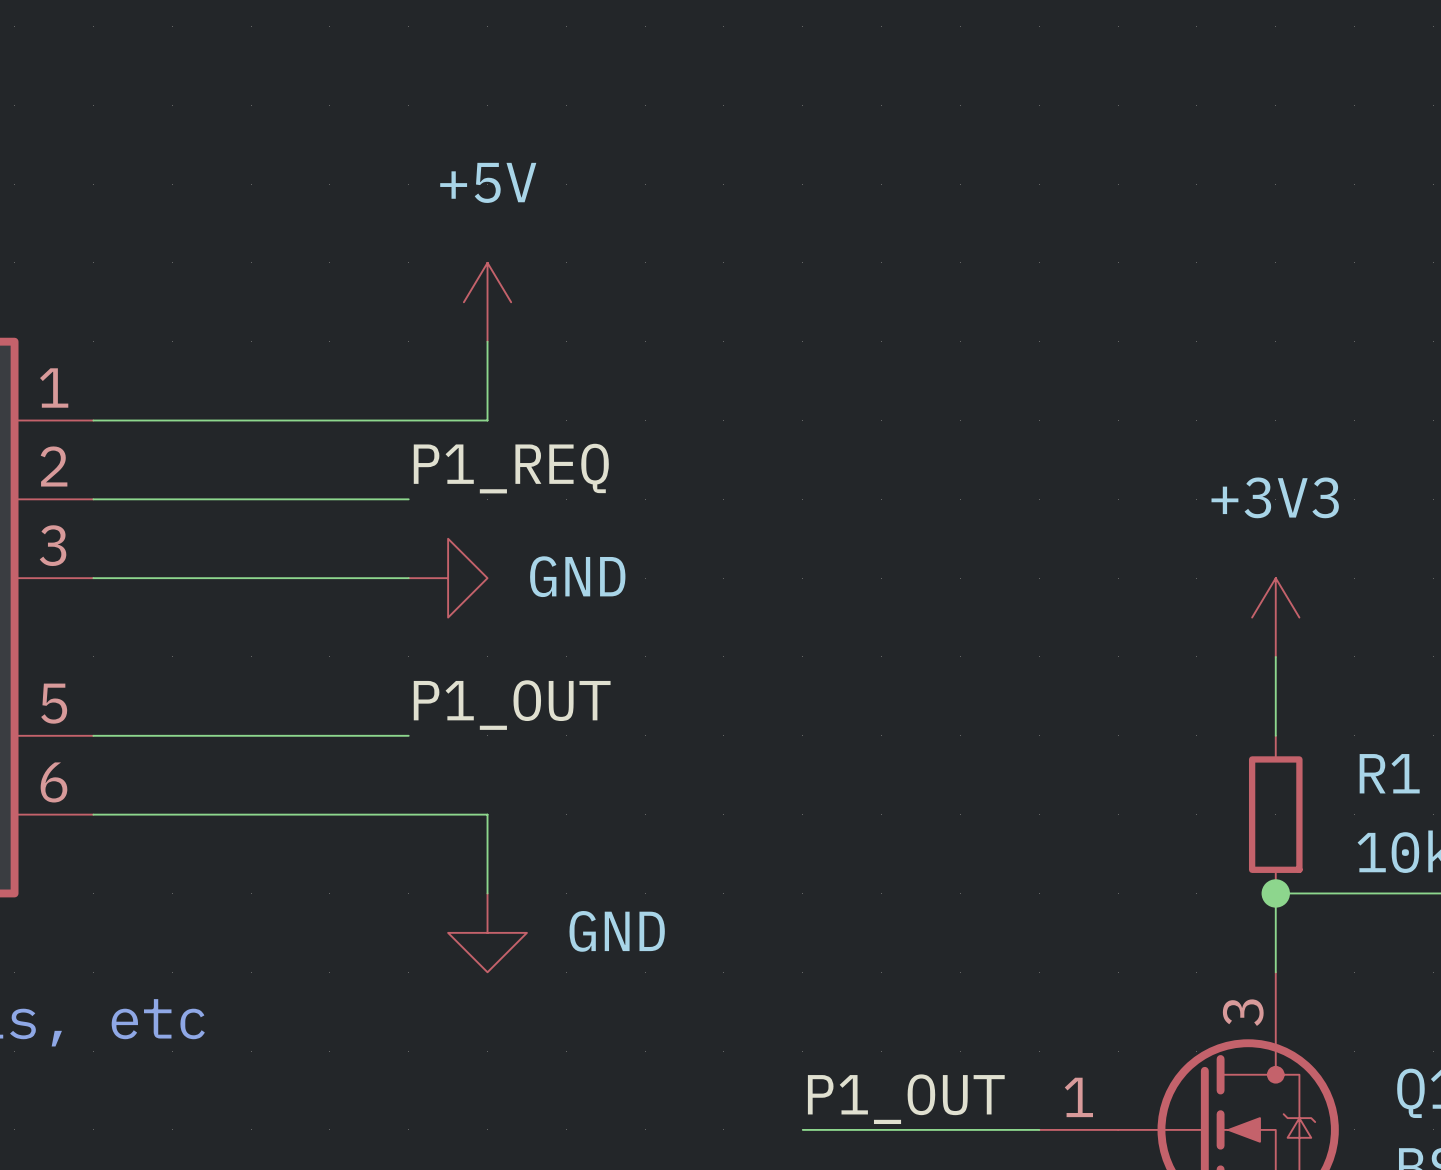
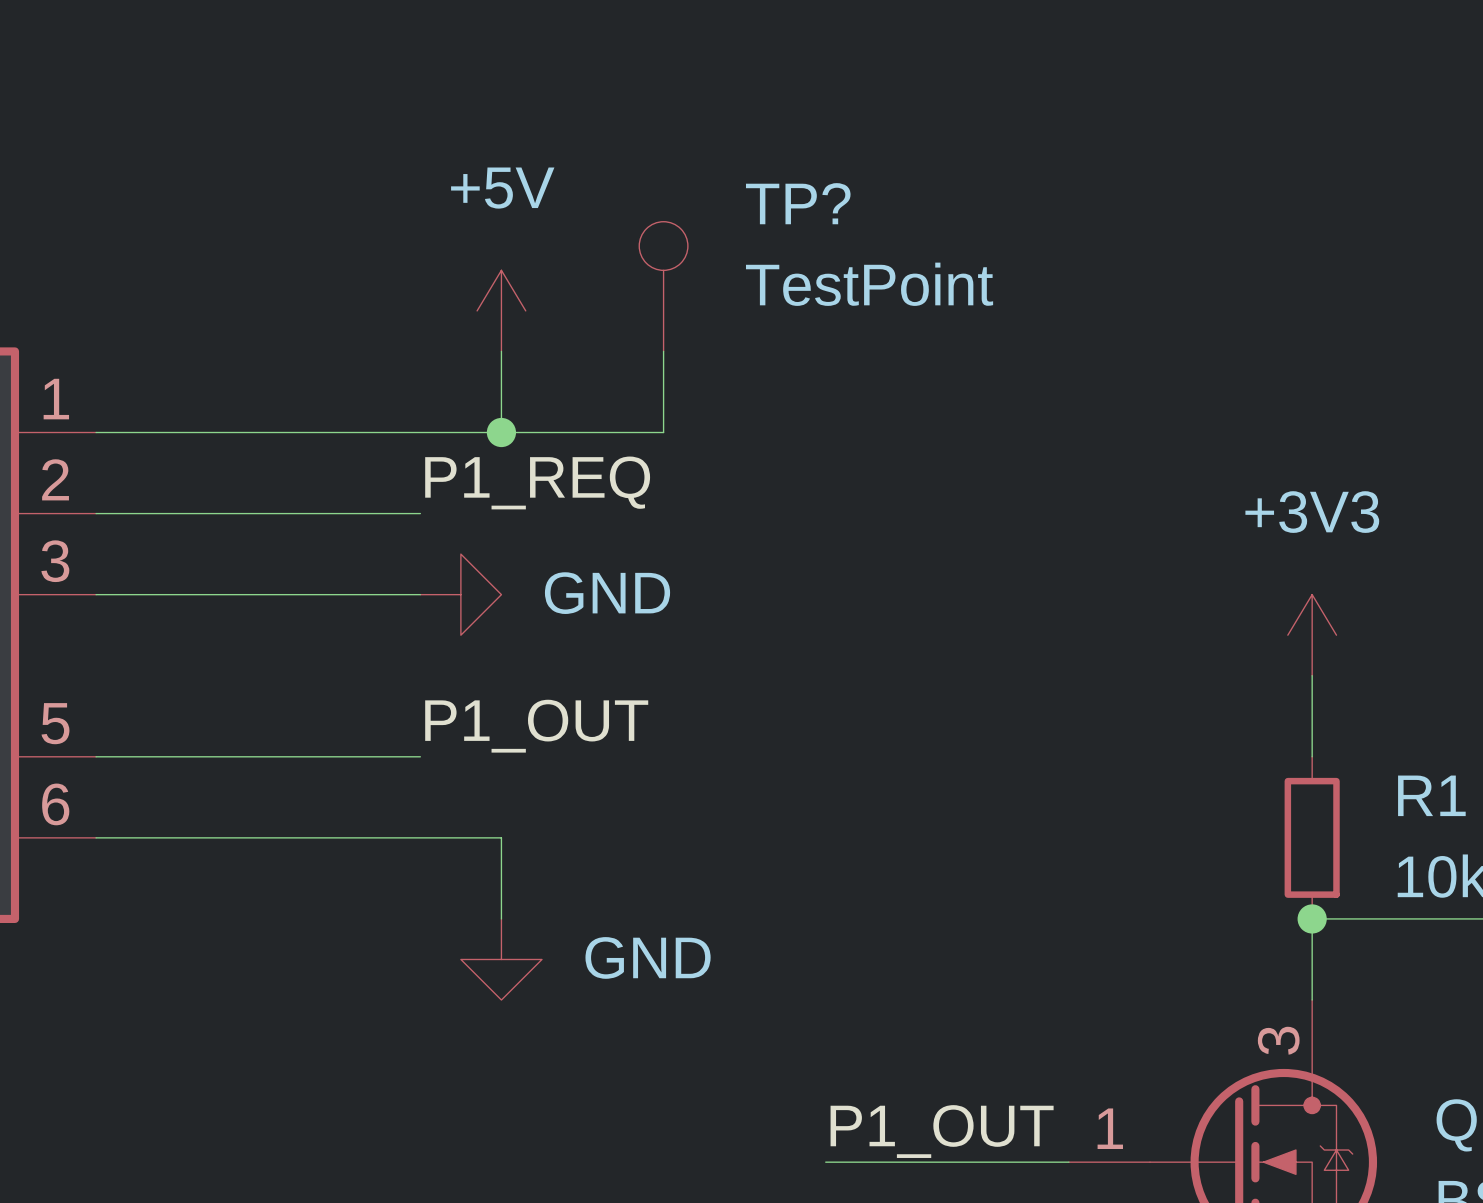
TP?: none -> TestPoint (663, 286)
wire: none -> (663, 351) (663, 432) (501, 432)
junction: none -> (501, 432)

